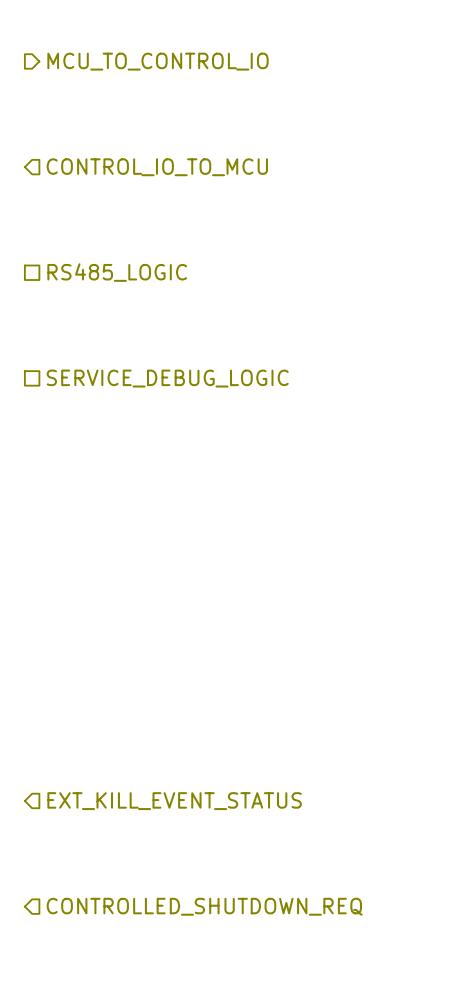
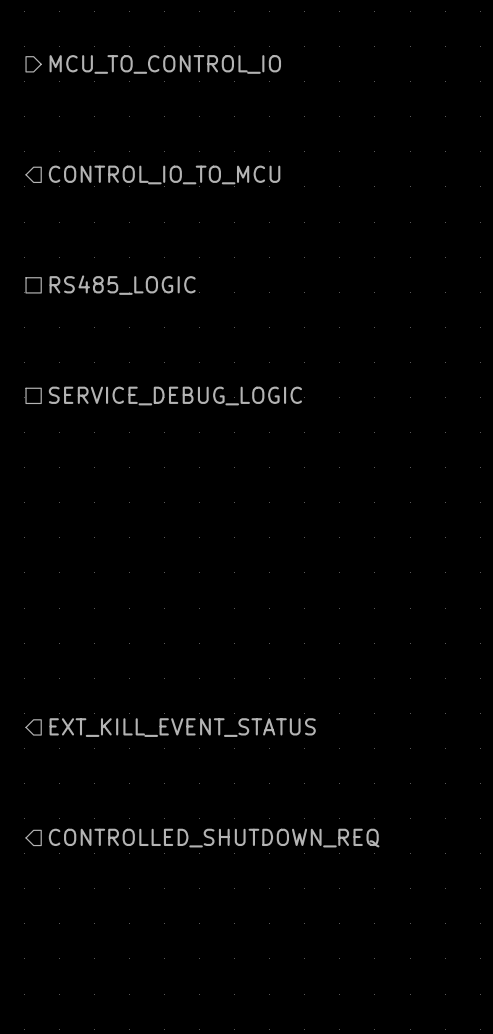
hierarchical label: none -> EXT_KILL_EVENT_STATUS (182, 727)
hierarchical label: EXT_KILL_EVENT_STATUS (174, 801) -> CONTROLLED_SHUTDOWN_REQ (214, 838)
hierarchical label: CONTROLLED_SHUTDOWN_REQ (204, 906) -> none

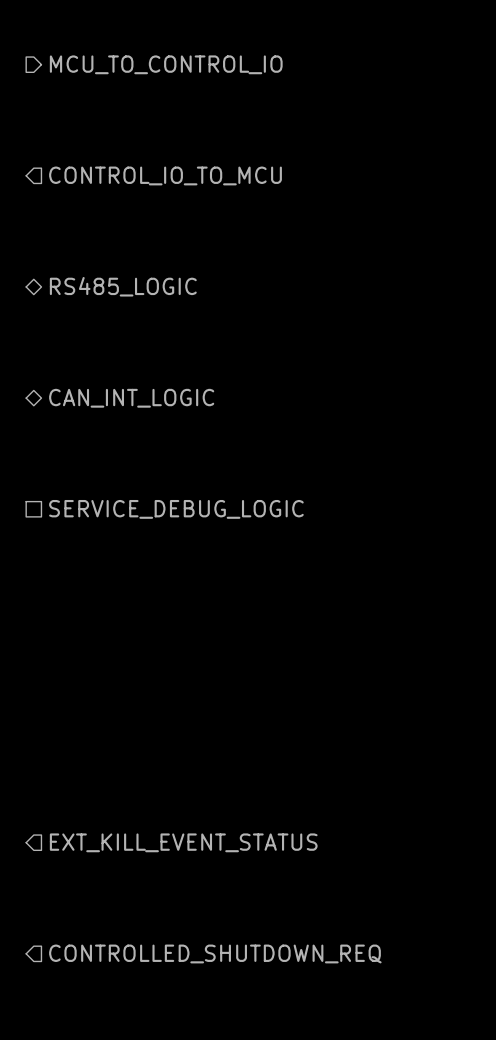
hierarchical label shape: passive (122, 285) -> bidirectional (123, 286)
hierarchical label shape: passive (175, 396) -> bidirectional (131, 398)
hierarchical label: SERVICE_DEBUG_LOGIC (175, 396) -> CAN_INT_LOGIC (131, 398)
hierarchical label: none -> SERVICE_DEBUG_LOGIC (176, 509)
hierarchical label: EXT_KILL_EVENT_STATUS (182, 727) -> none
hierarchical label: CONTROLLED_SHUTDOWN_REQ (214, 838) -> EXT_KILL_EVENT_STATUS (183, 842)
hierarchical label: none -> CONTROLLED_SHUTDOWN_REQ (215, 953)

